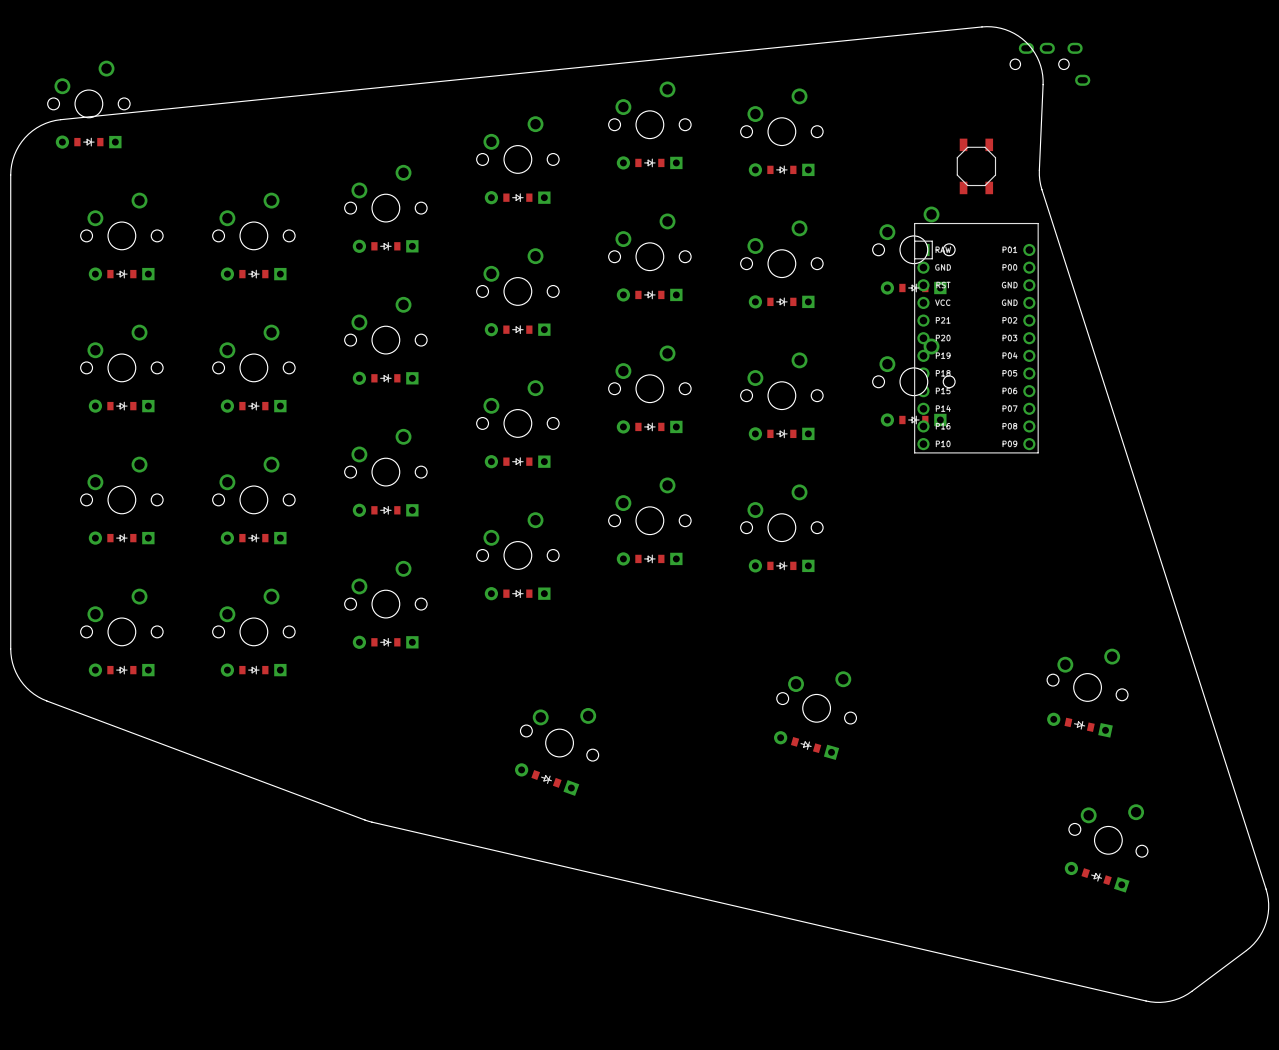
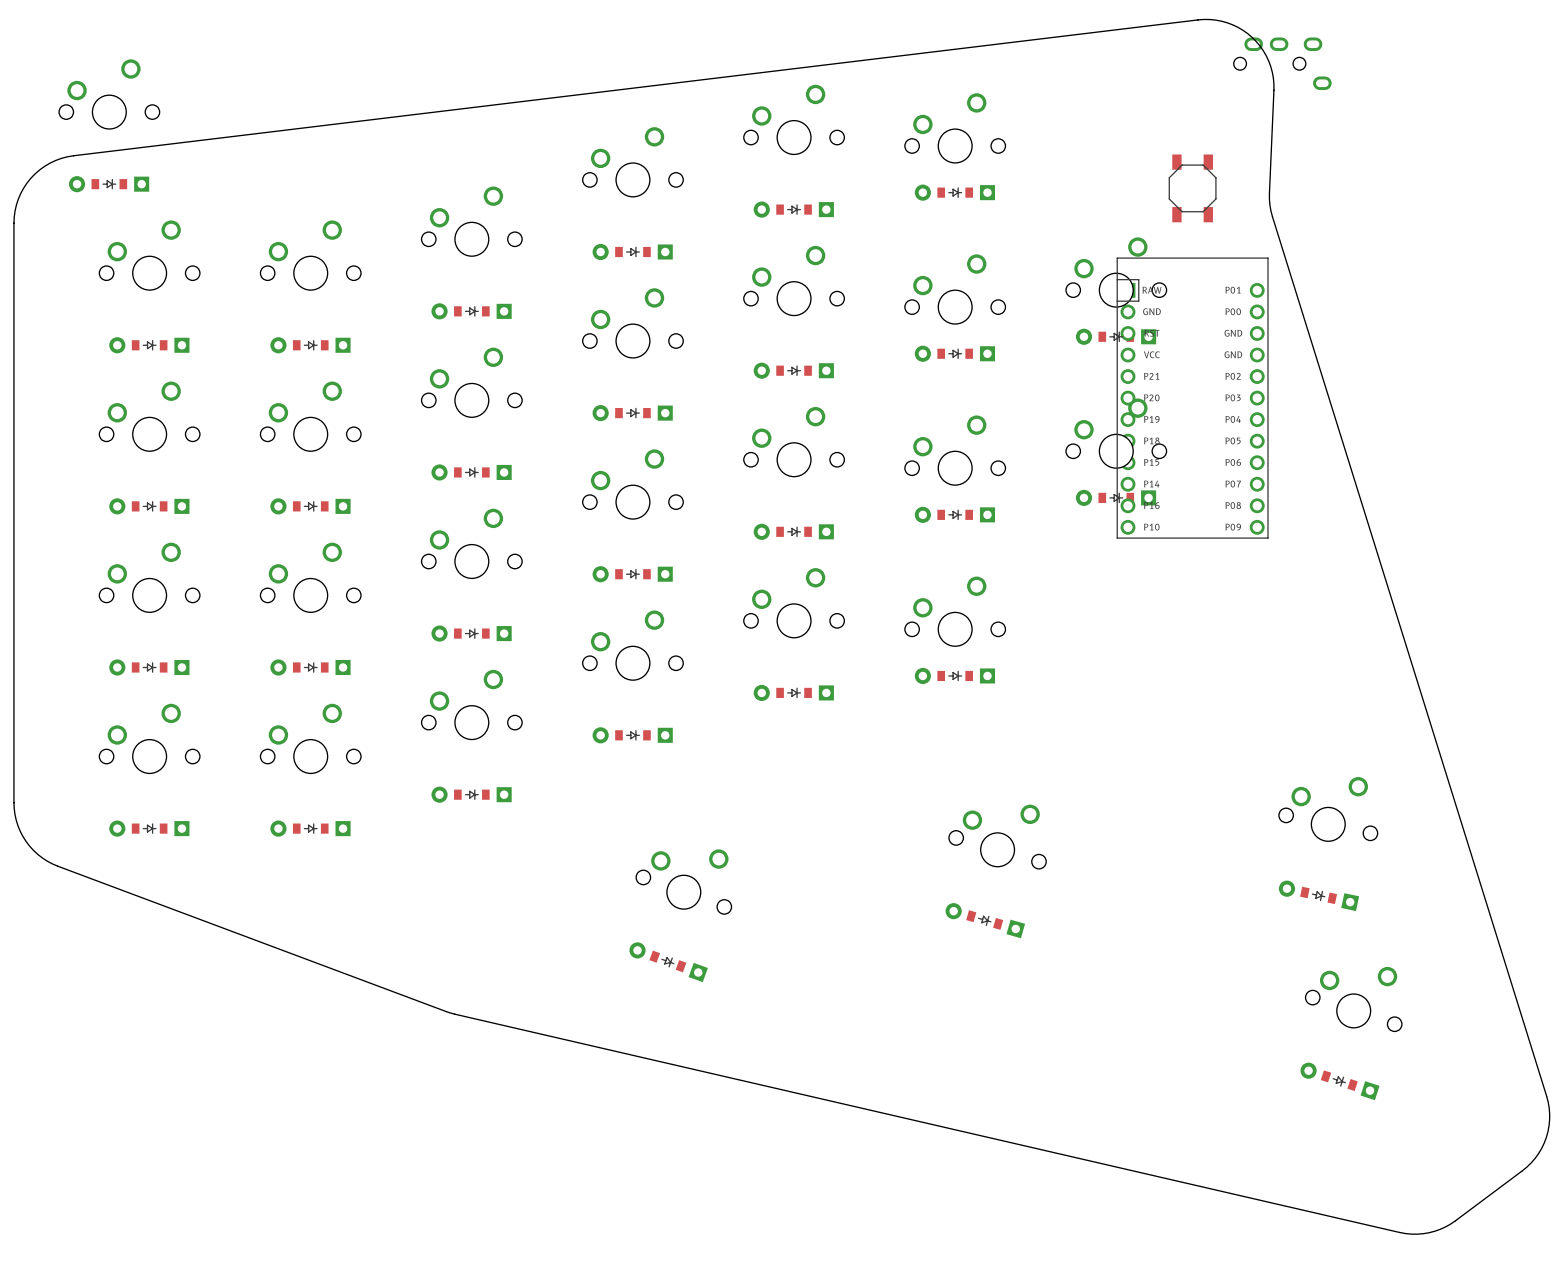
board edge: (1043, 85) (1040, 65) (1029, 45) (1009, 31) (986, 26) (60, 119) (36, 127) (18, 145) (11, 164) (10, 194) -> (1273, 90) (1273, 78) (1268, 61) (1263, 51) (1252, 37) (1242, 30) (1227, 22) (1215, 20) (1198, 19) (67, 156) (50, 163) (31, 178) (18, 199) (13, 223)
part position: (88, 142) -> (109, 184)
part position: (649, 162) -> (793, 209)
board edge: (1039, 170) (1041, 189) (1268, 898) (1266, 922) (1253, 944) (1183, 996) (1165, 1002) (1146, 1000) (368, 821) (42, 699) (30, 691) (20, 680) (14, 667) (10, 648) -> (1269, 193) (1272, 216) (1549, 1107) (1549, 1119) (1546, 1137) (1538, 1153) (1531, 1162) (1445, 1226) (1423, 1233) (1399, 1232) (450, 1013) (47, 861) (29, 846) (17, 825) (14, 808) (13, 777)
part position: (517, 197) -> (632, 251)
part position: (385, 246) -> (471, 311)
part position: (121, 274) -> (149, 345)
part position: (253, 274) -> (310, 345)
part position: (649, 294) -> (793, 370)
part position: (517, 329) -> (632, 413)
part position: (385, 378) -> (471, 472)
part position: (121, 406) -> (149, 506)
part position: (253, 406) -> (310, 506)
part position: (649, 426) -> (793, 531)
part position: (517, 461) -> (632, 574)
part position: (385, 510) -> (471, 633)
part position: (121, 538) -> (149, 667)
part position: (253, 538) -> (310, 667)
part position: (649, 558) -> (793, 692)
part position: (517, 593) -> (632, 735)
part position: (385, 642) -> (471, 794)
part position: (121, 670) -> (149, 828)
part position: (253, 670) -> (310, 828)
part position: (1079, 725) -> (1319, 895)
part position: (806, 745) -> (985, 920)
part position: (547, 779) -> (668, 962)
part position: (1097, 877) -> (1340, 1081)

